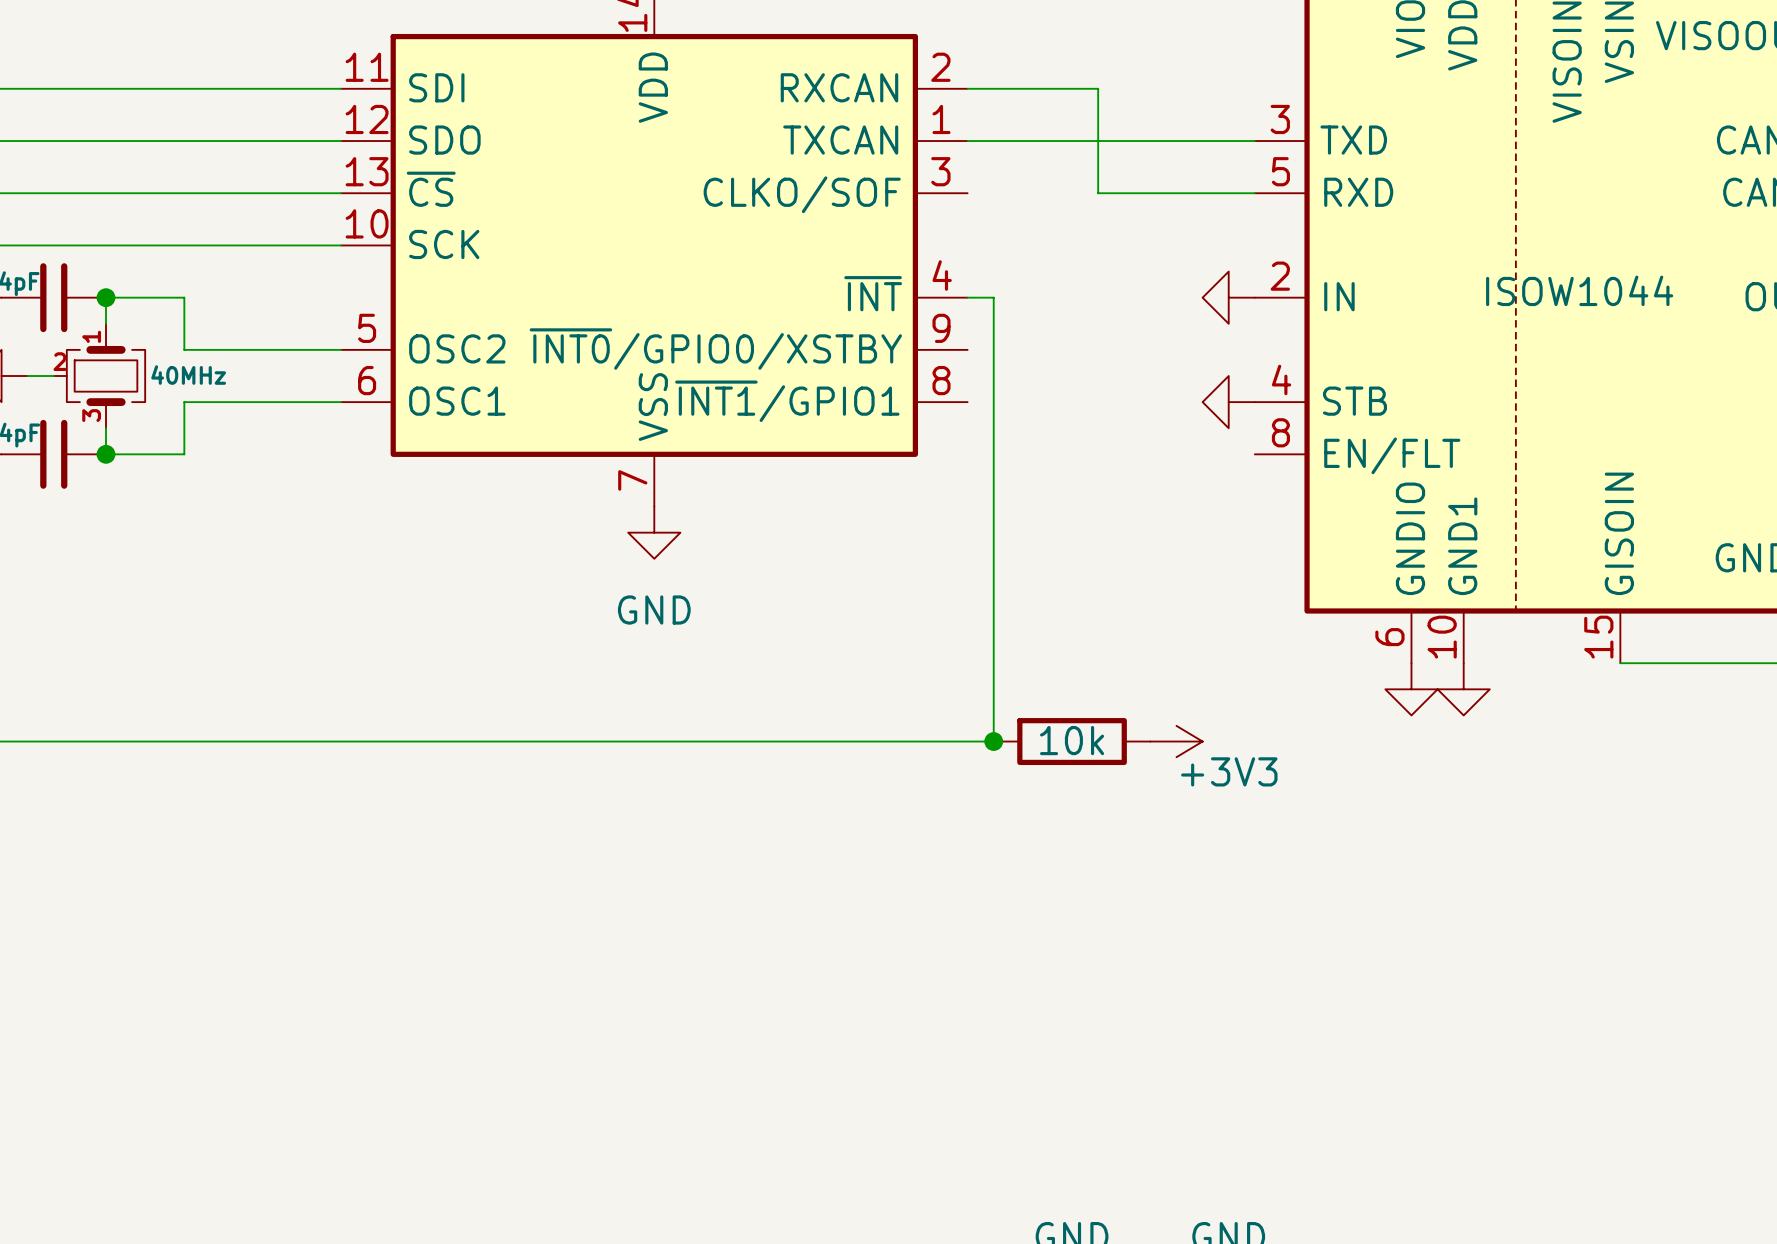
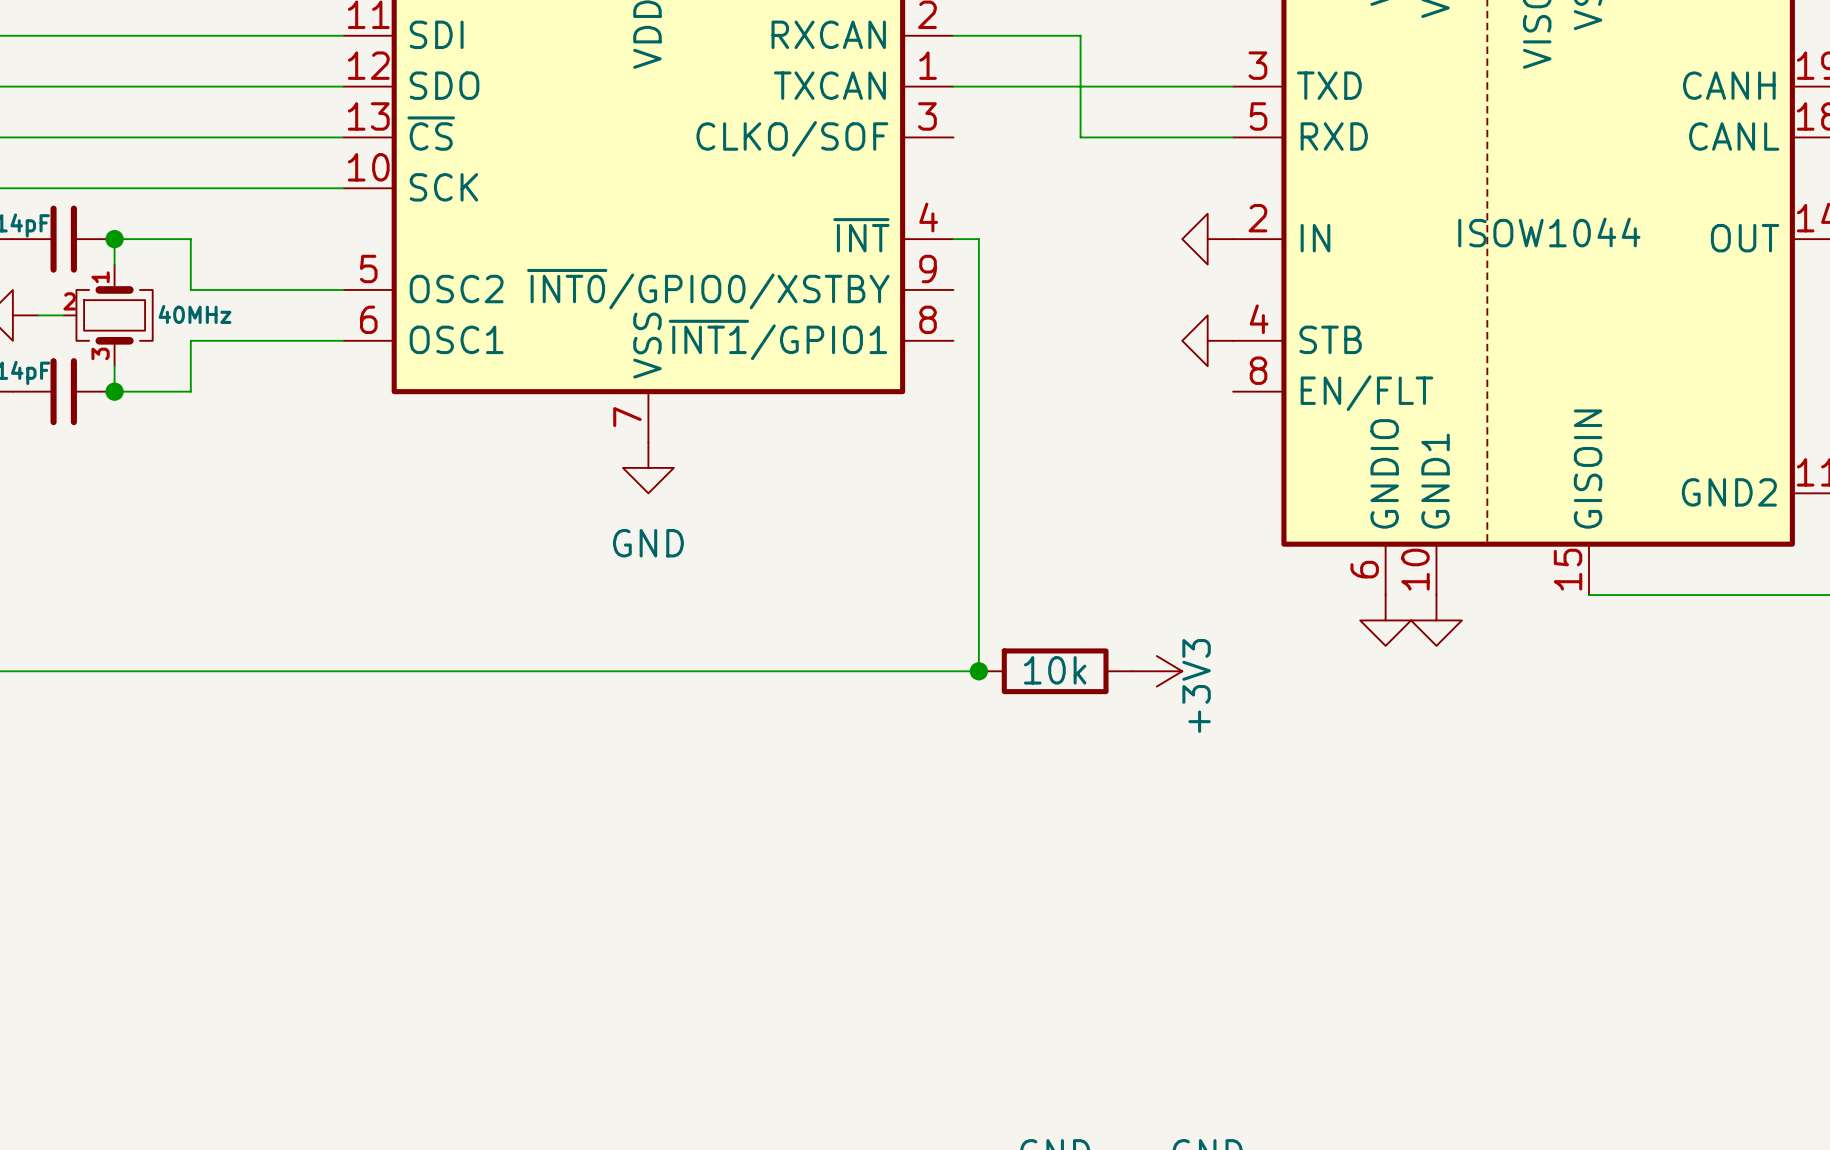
power symbol text rotation: 0° (1229, 771) -> 90° counterclockwise (1196, 685)

